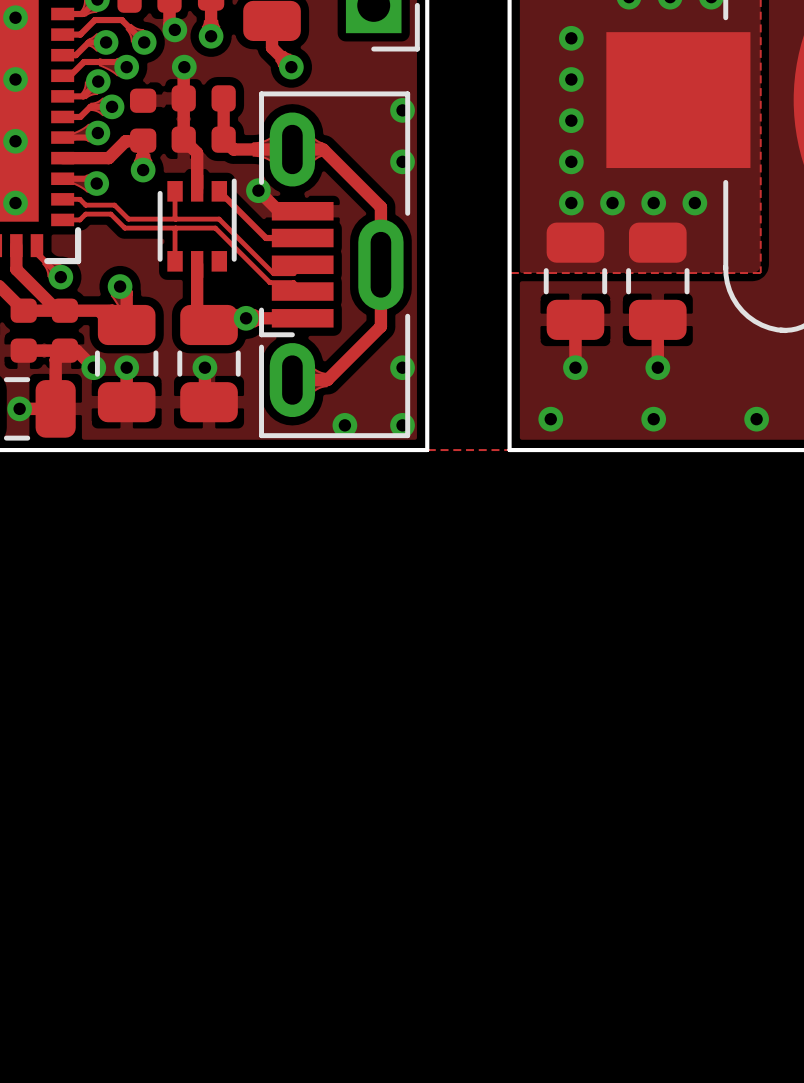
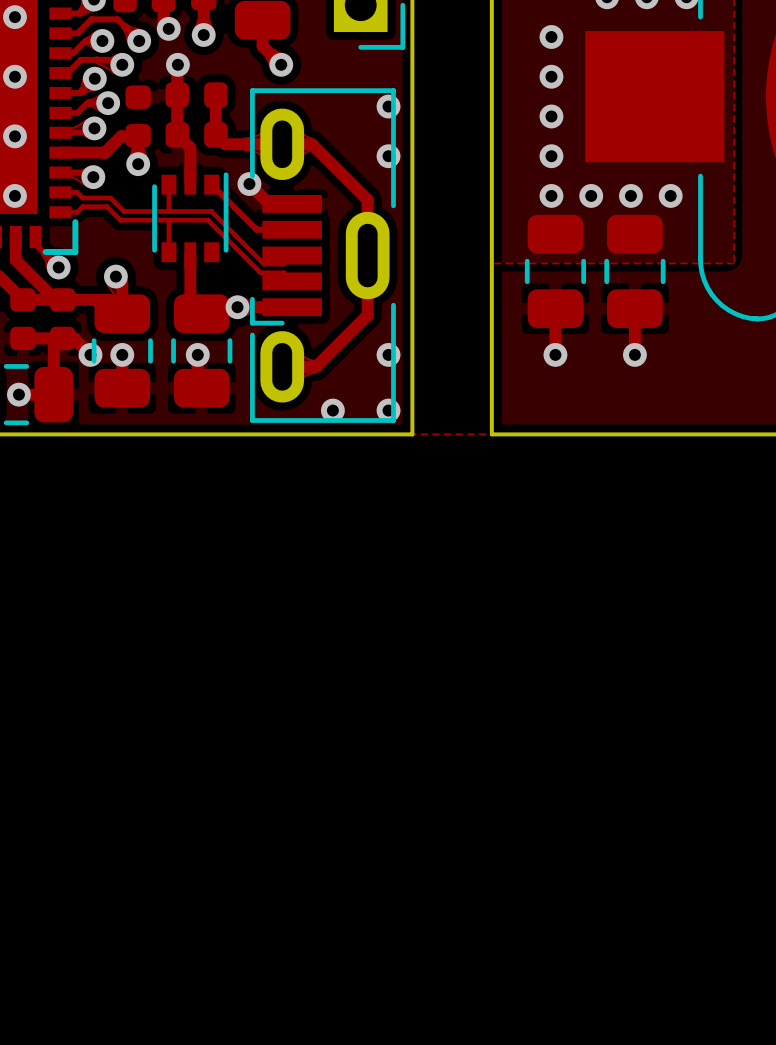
via: (550, 419) -> none
via: (653, 419) -> none
via: (756, 419) -> none

